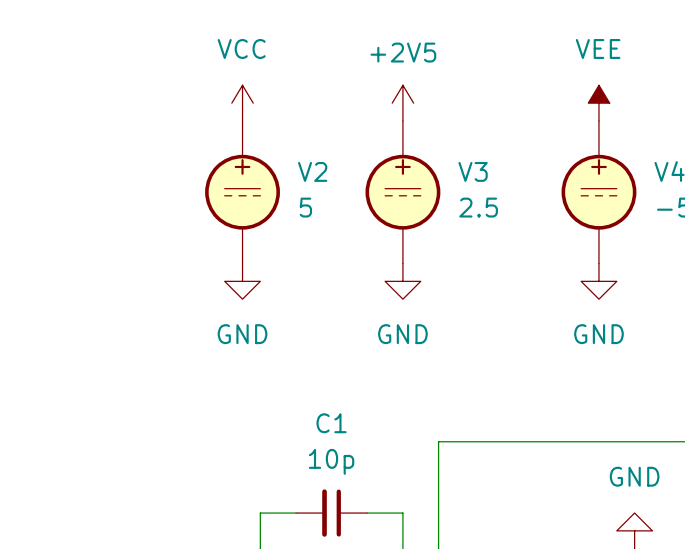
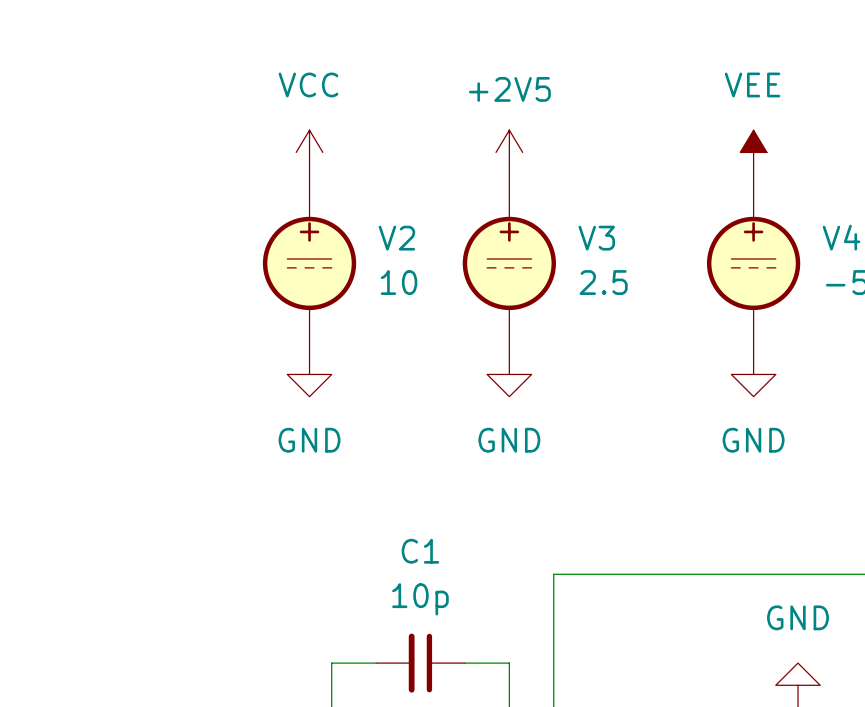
V2 value: 5 (305, 207) -> 10 (399, 282)

